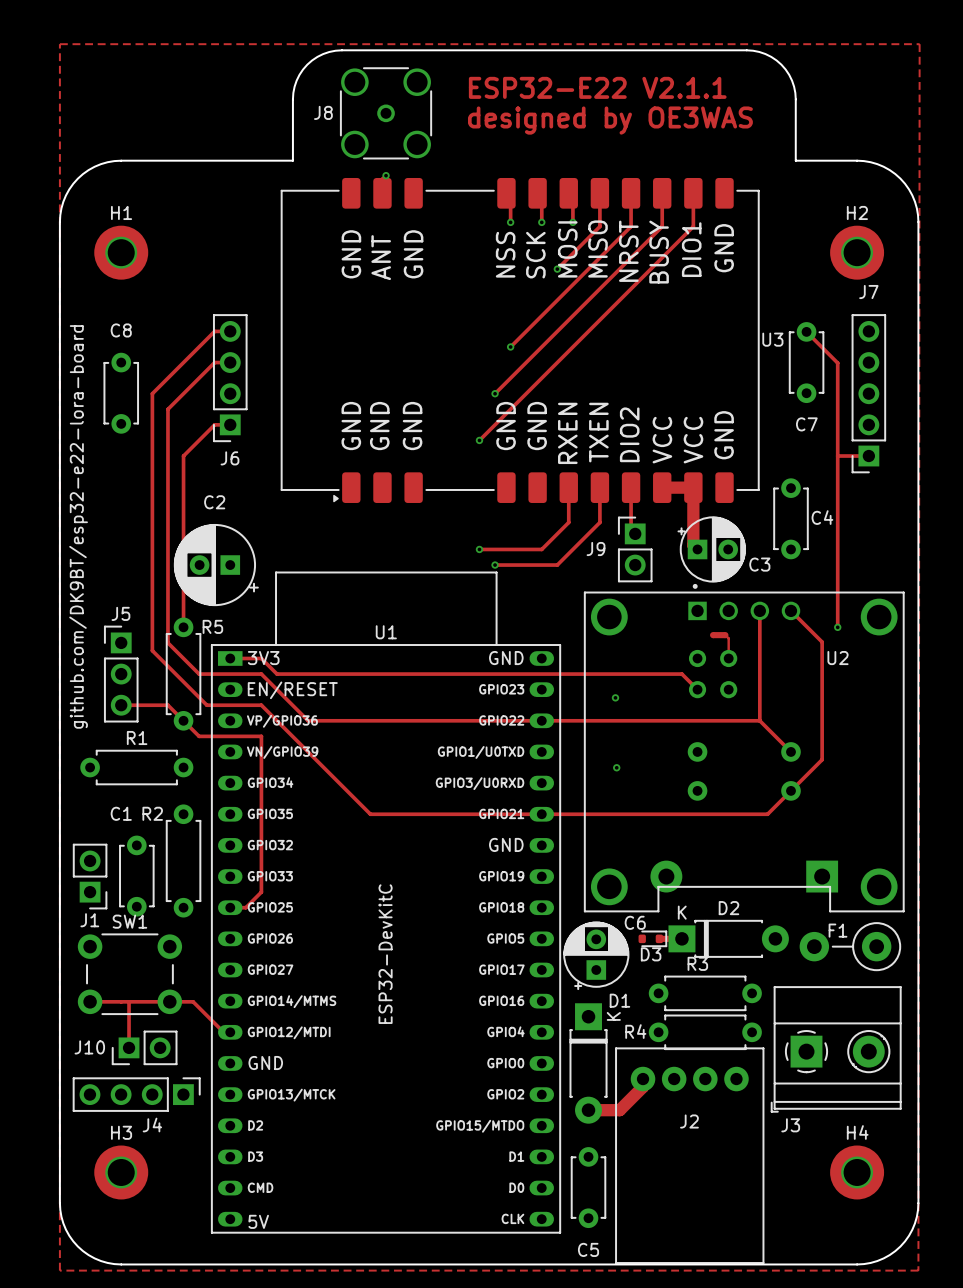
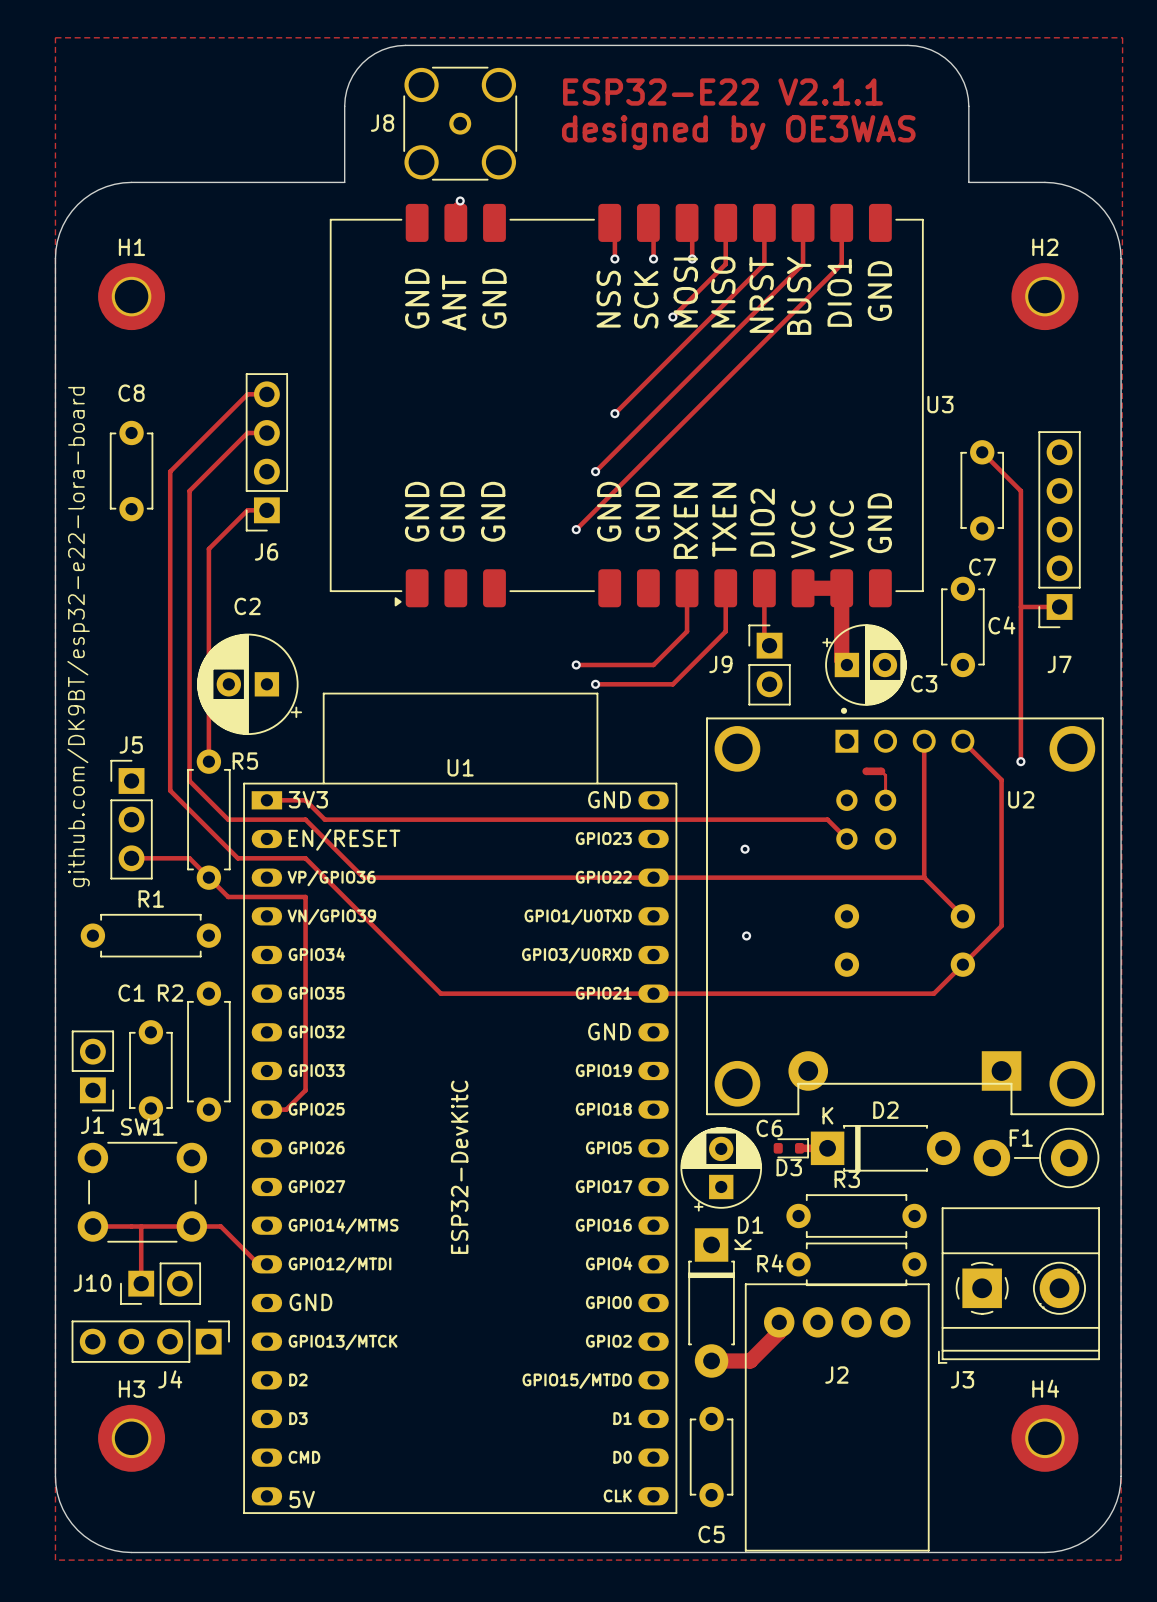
J7 name position: J7 (868, 292) -> J7 (1059, 664)
track: (806, 331) (837, 363) (837, 409) -> (982, 452) (1020, 490)
C7 position: (806, 362) -> (982, 490)
J7 position: (868, 393) -> (1059, 529)
track: (837, 456) (868, 456) -> (1020, 606) (1059, 606)

